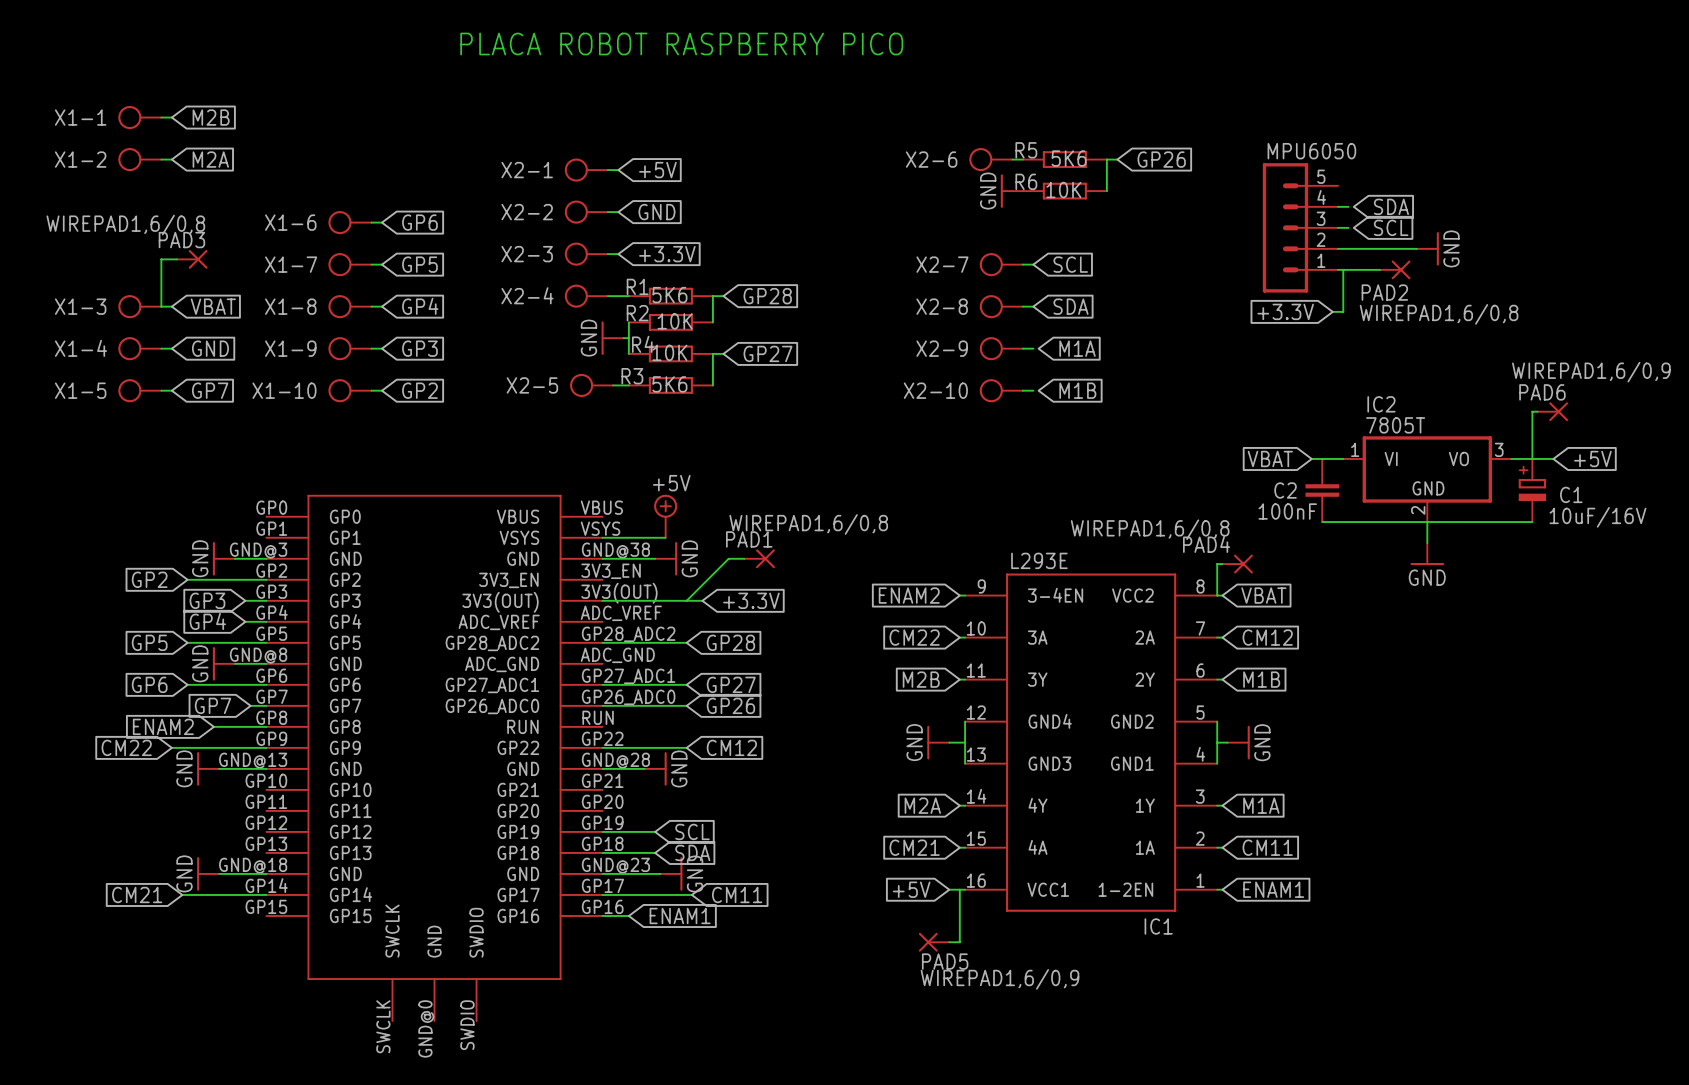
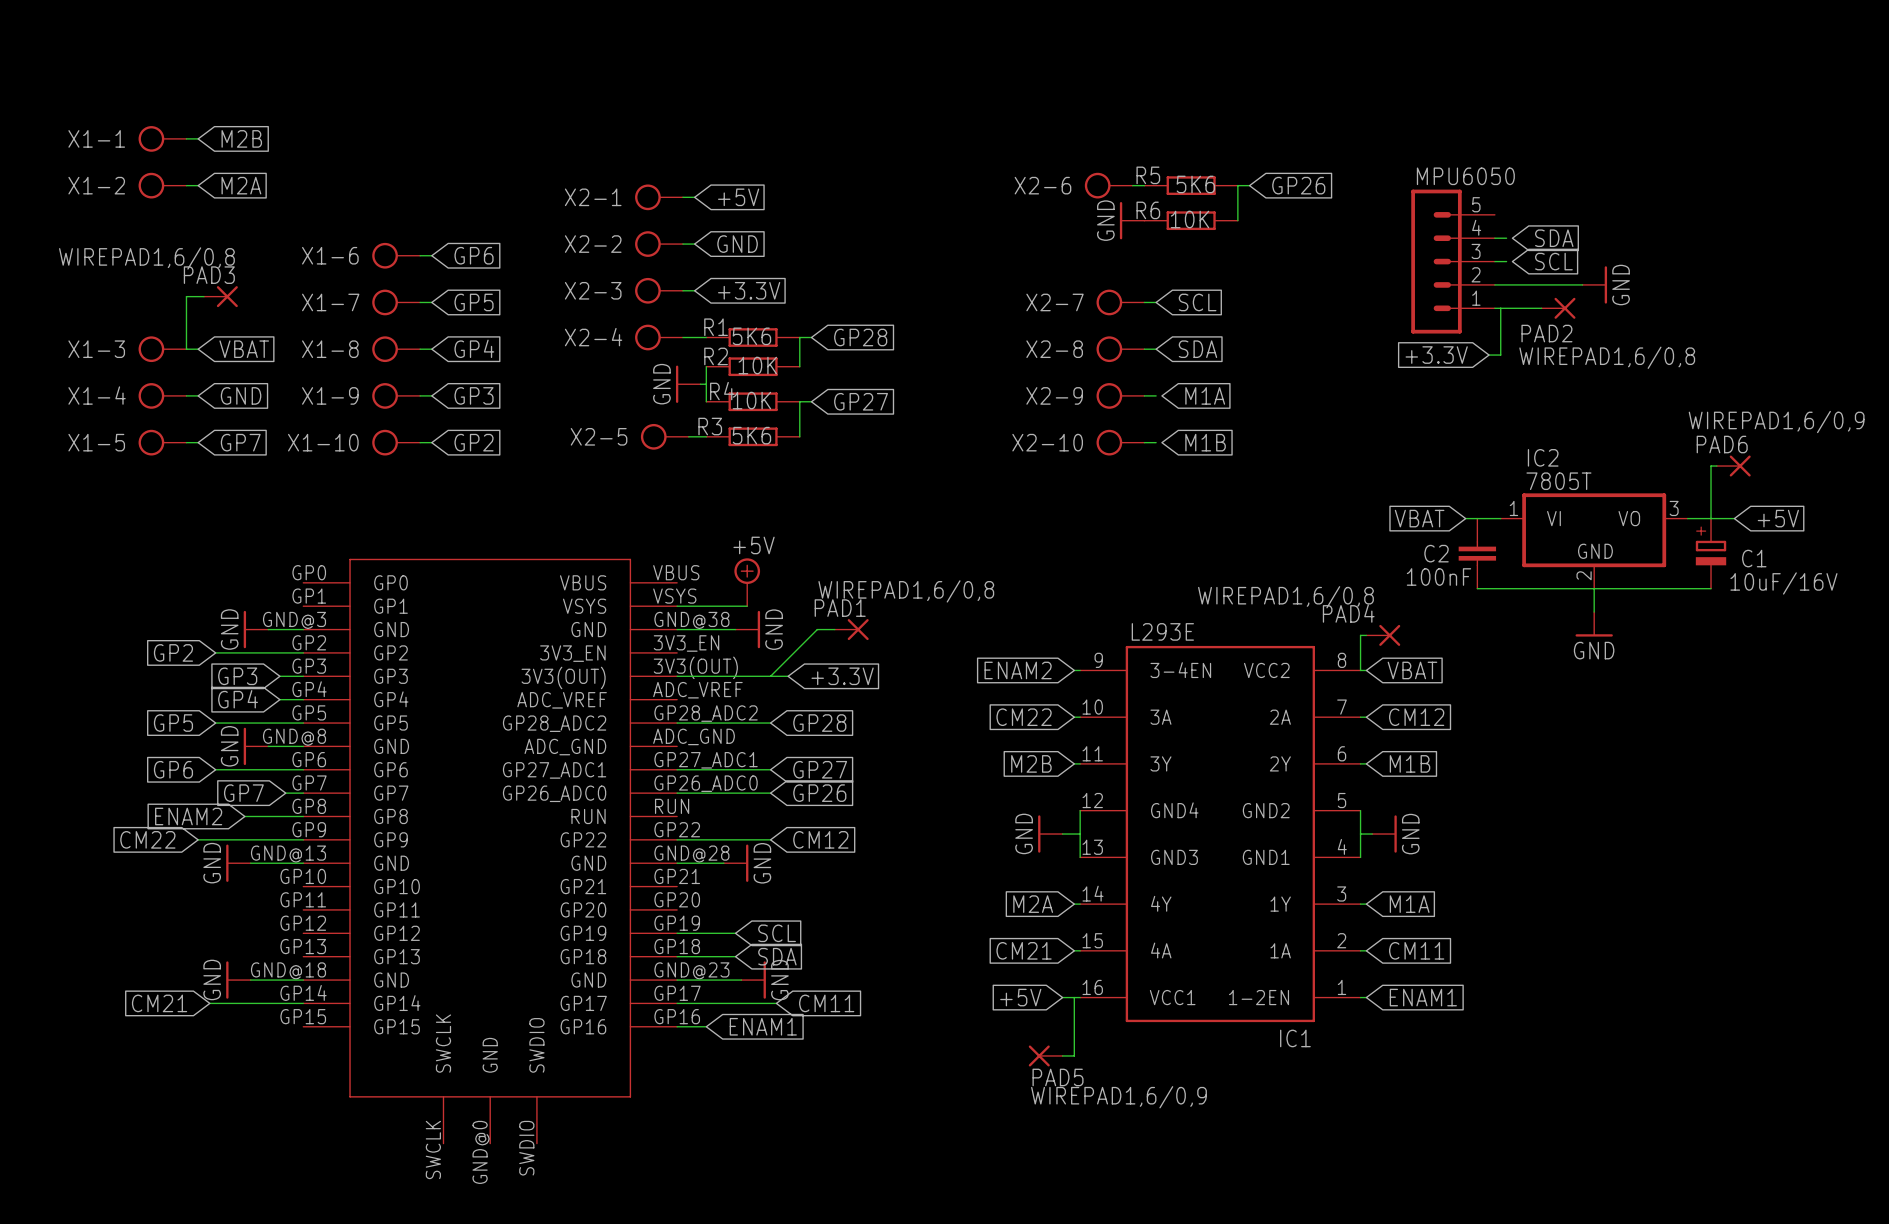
text: PLACA ROBOT RASPBERRY PICO (681, 44) -> none

